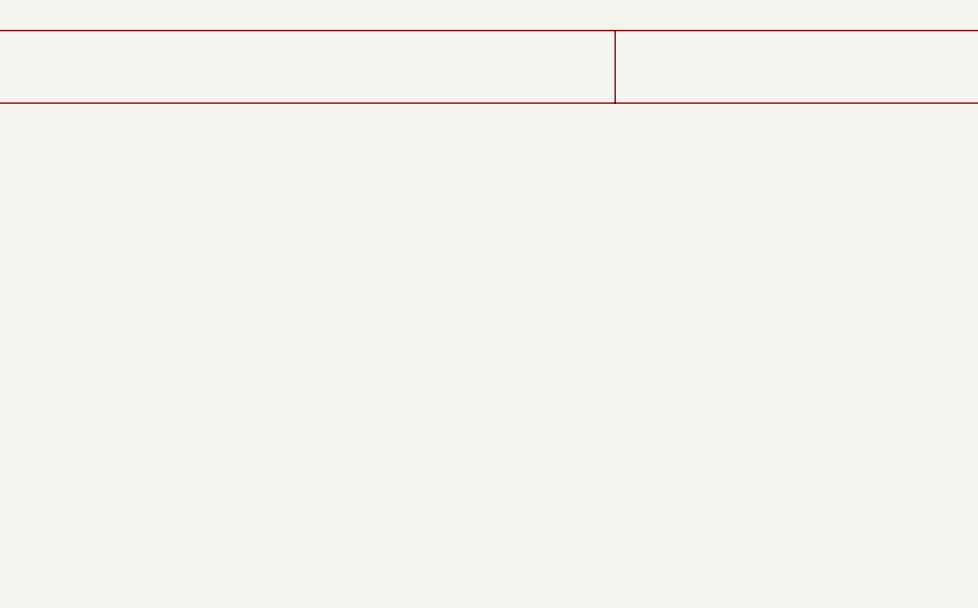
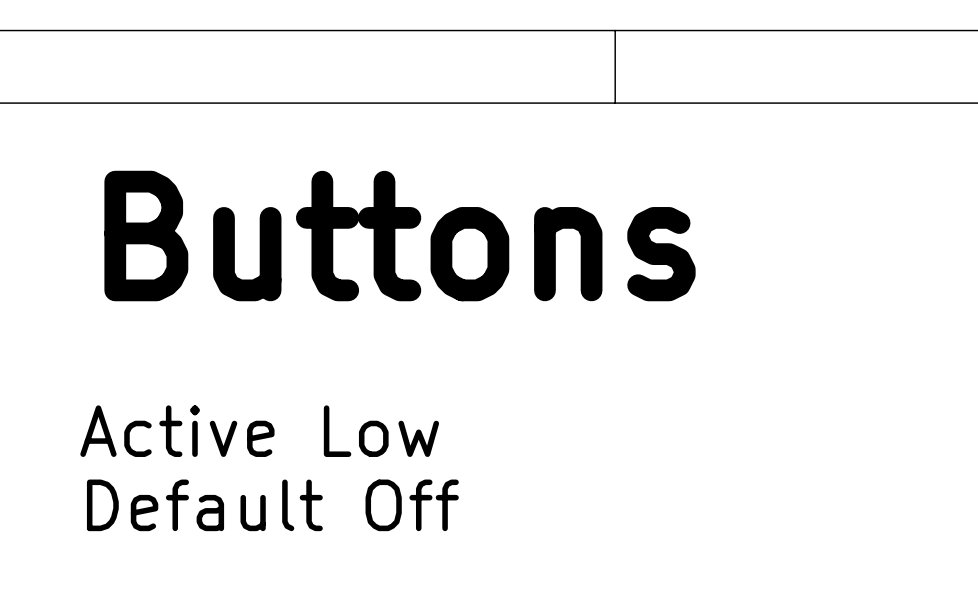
text: none -> Buttons (400, 236)
text: none -> Active Low (259, 431)
text: none -> Default Off (272, 505)

